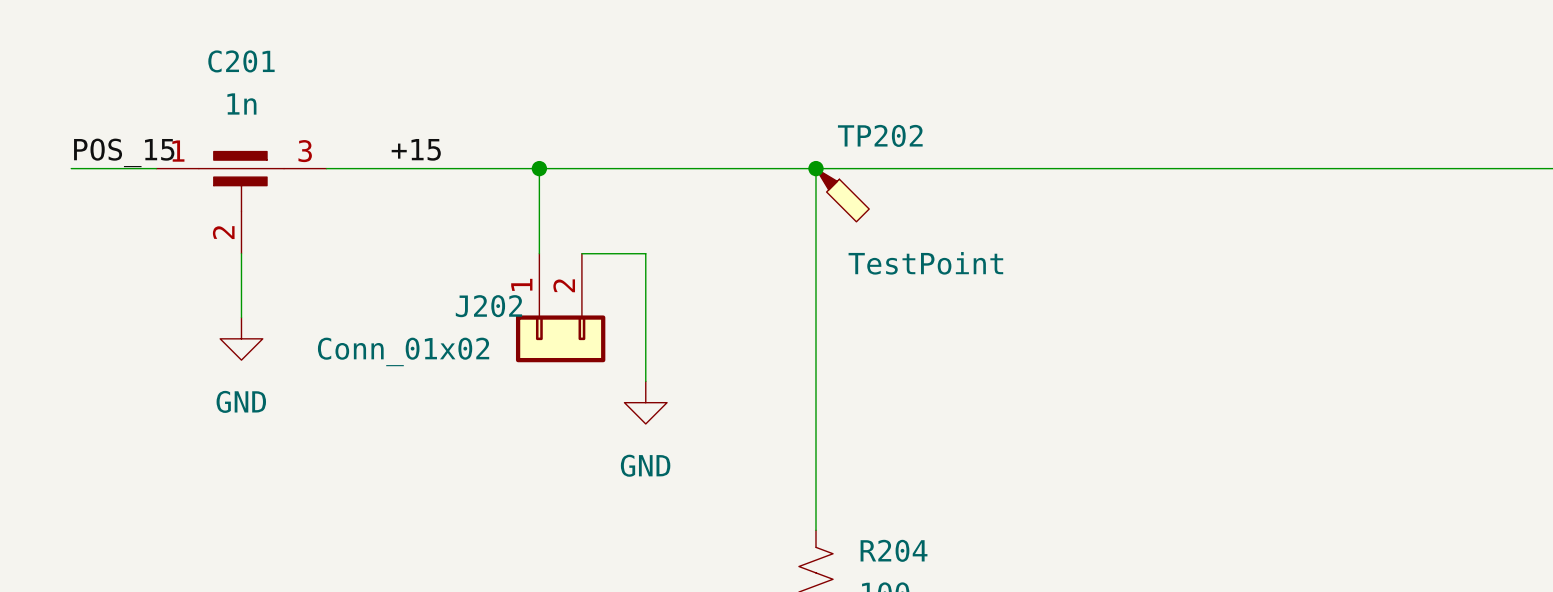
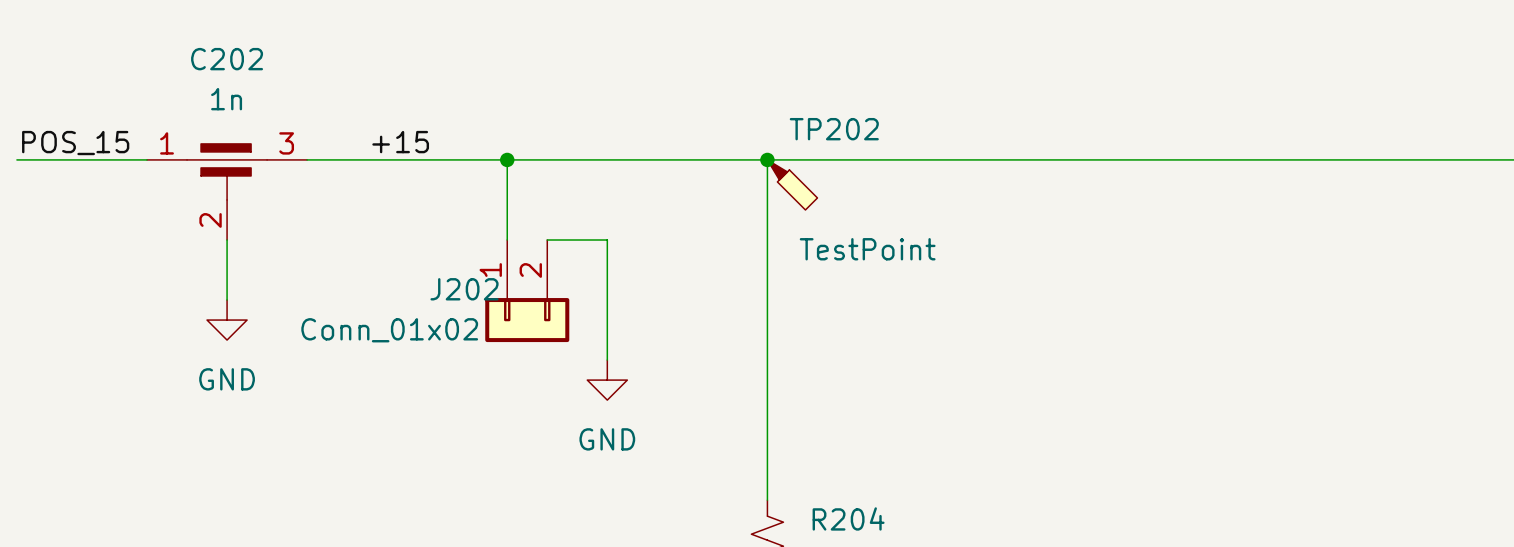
C201 name: C201 (241, 61) -> C202 (227, 59)
label position: POS_15 (124, 152) -> POS_15 (75, 143)
wire: none -> (16, 159) (66, 159)

